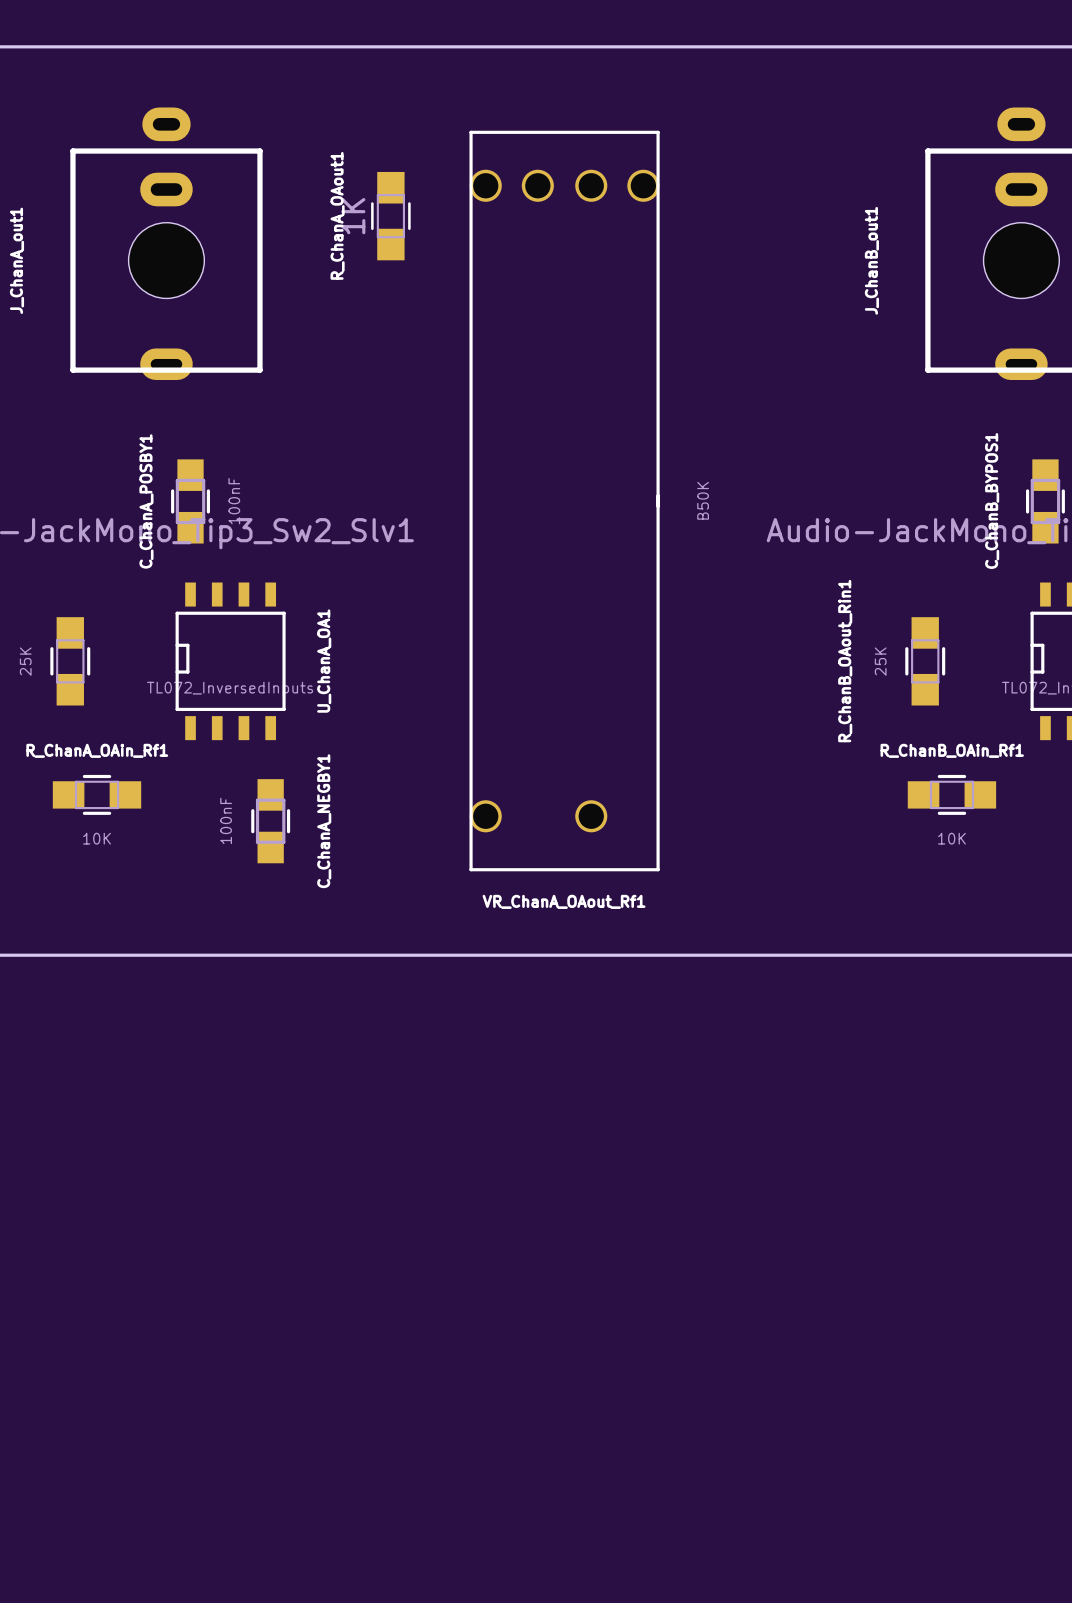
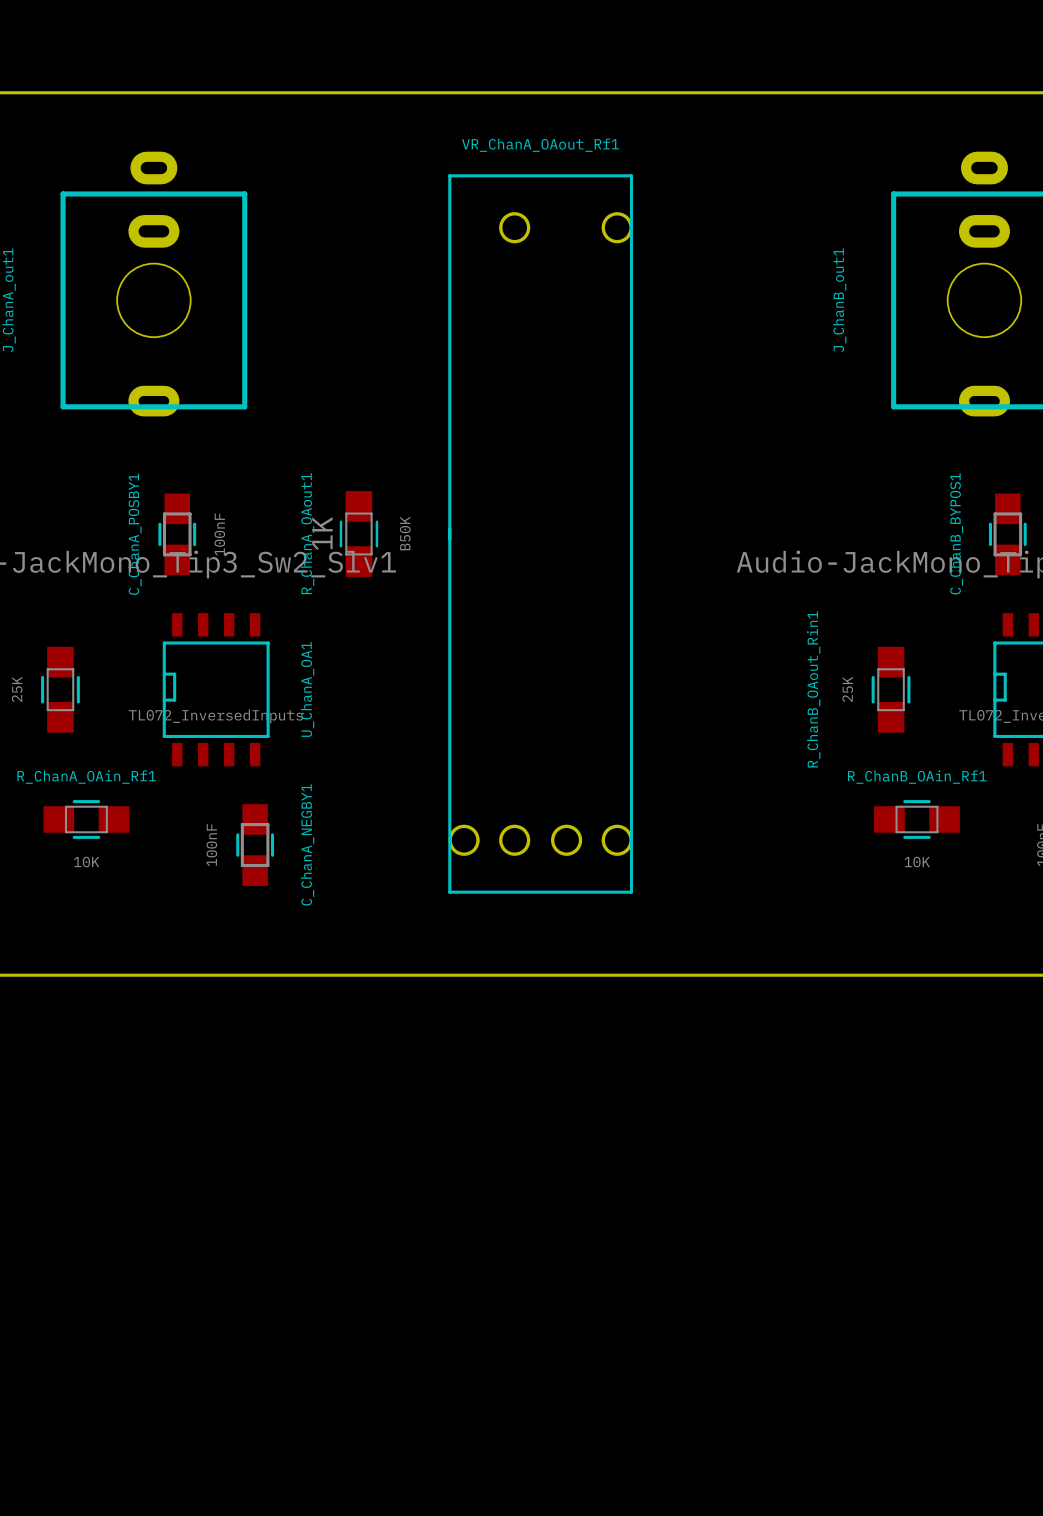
R_ChanA_OAout1 position: (390, 216) -> (358, 533)
VR_ChanA_OAout_Rf1 rotation: 0° (564, 501) -> 180° (540, 533)

